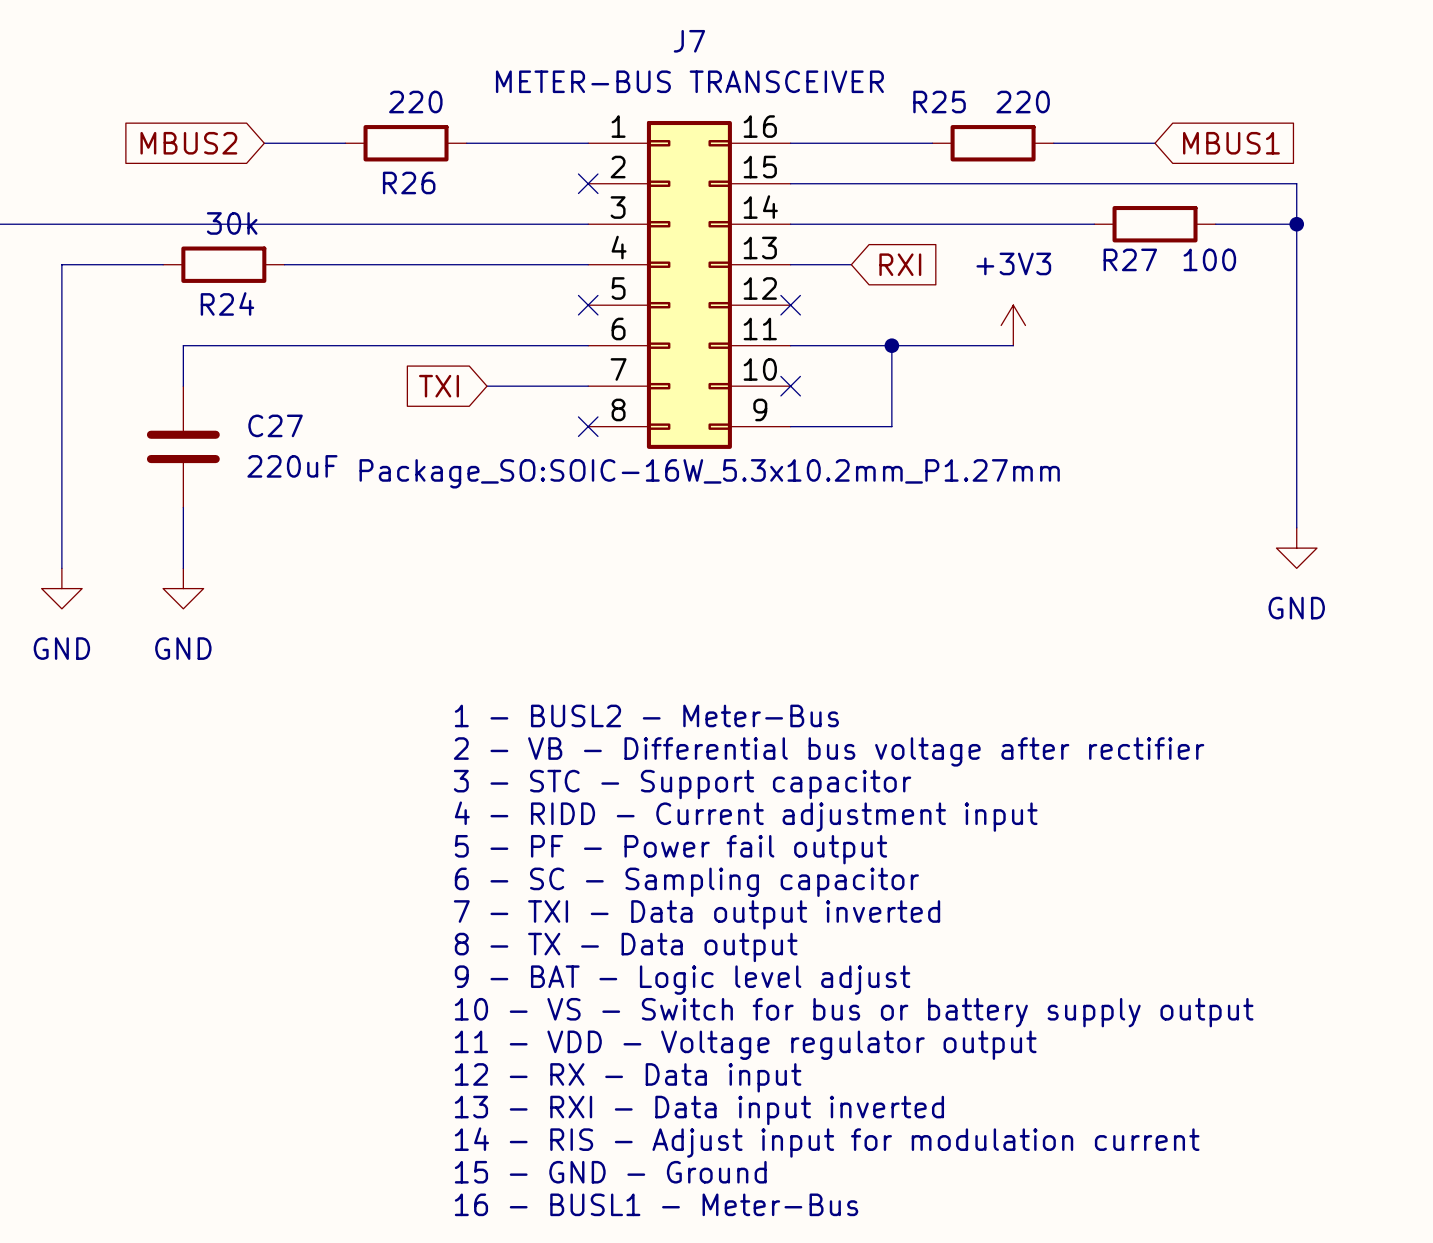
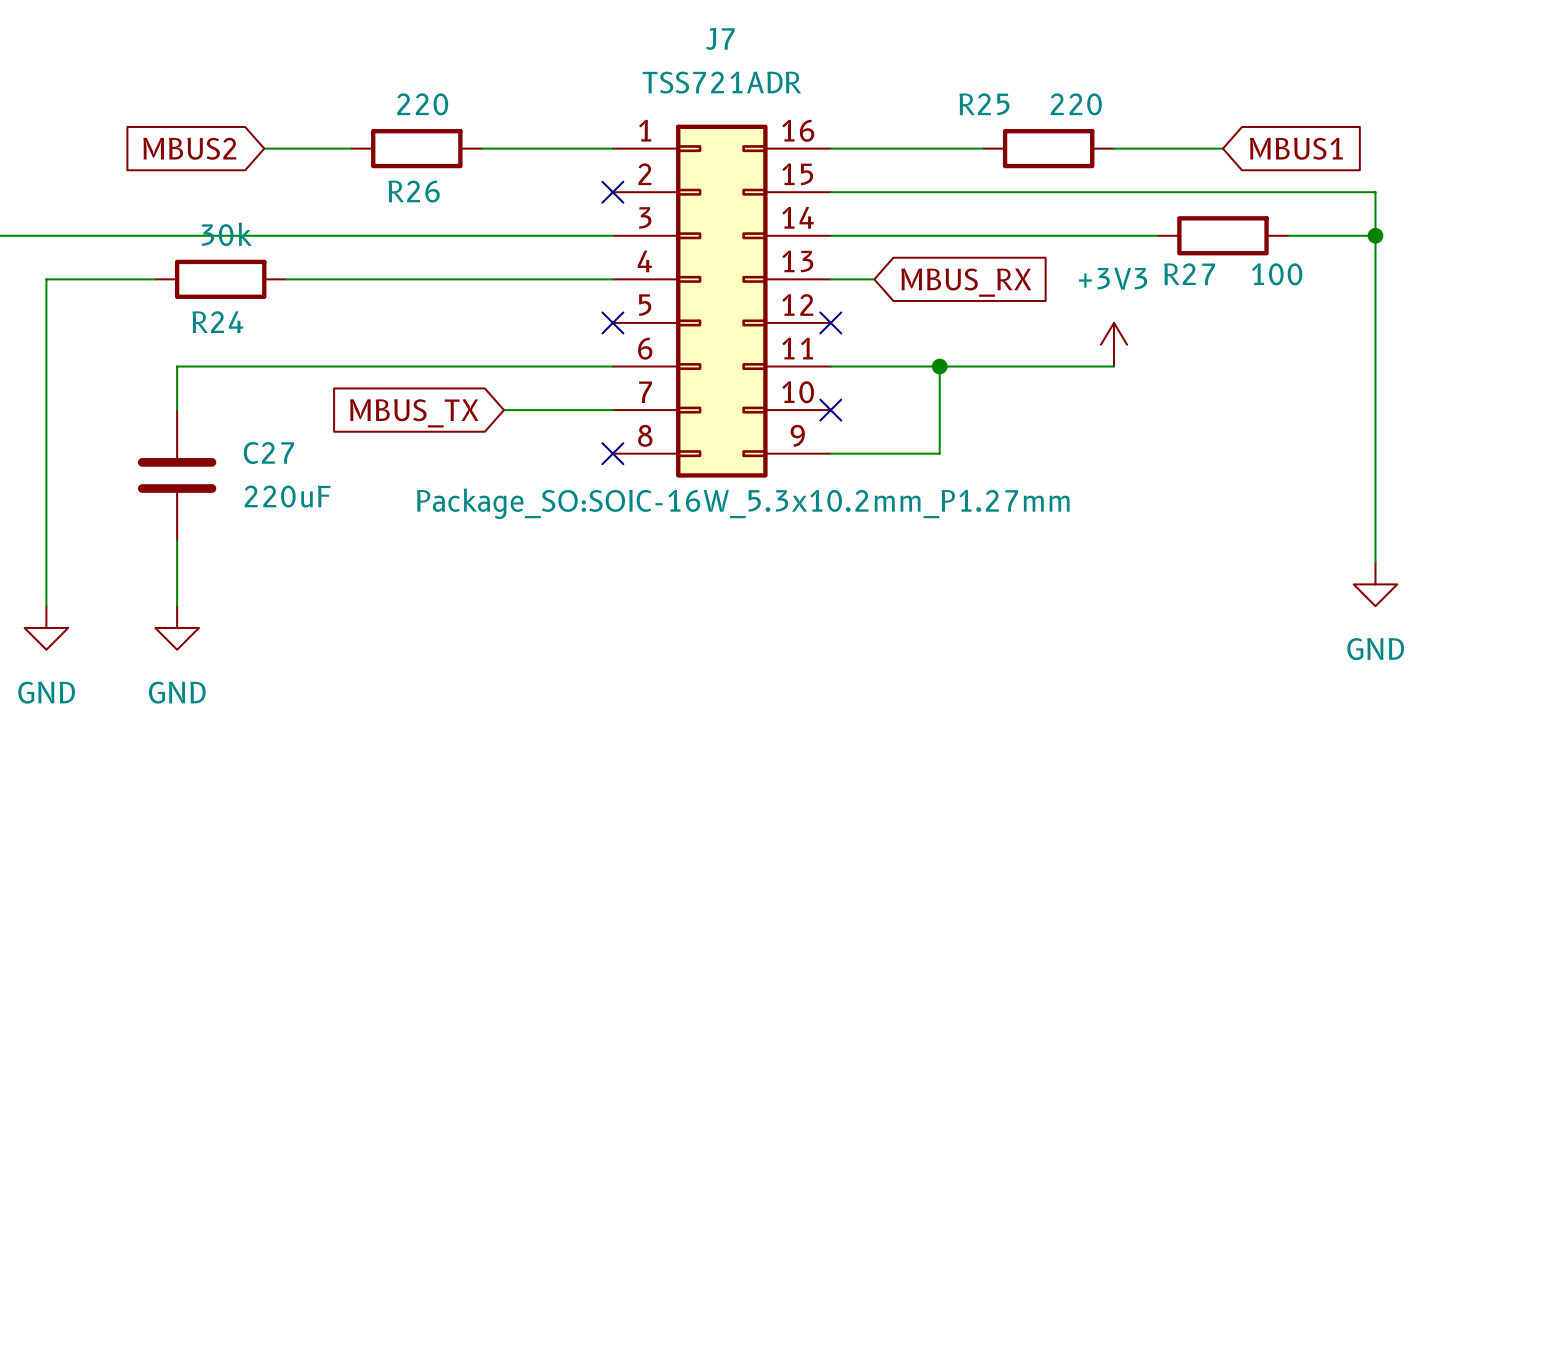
J7 value: METER-BUS TRANSCEIVER (689, 81) -> TSS721ADR (721, 82)
wire: (831, 264) (851, 264) -> none
global label: RXI (900, 264) -> none
global label: none -> MBUS_RX (966, 282)
power symbol position: +3V3 (1013, 325) -> +3V3 (1114, 344)
wire: none -> (1070, 366) (1114, 366)
global label: TXI (439, 386) -> MBUS_TX (414, 413)
text: 1 - BUSL2 - Meter-Bus (646, 715) -> none
text: 2 - VB - Differential bus voltage after rectifier (829, 751) -> none
text: 3 - STC - Support capacitor (682, 784) -> none
text: 4 - RIDD - Current adjustment input (746, 816) -> none
text: 5 - PF - Power fail output (670, 849) -> none
text: 6 - SC - Sampling capacitor (686, 882) -> none
text: 7 - TXI - Data output inverted (697, 914) -> none
text: 8 - TX - Data output (626, 947) -> none
text: 9 - BAT - Logic level adjust (682, 980) -> none
text: 10 - VS - Switch for bus or battery supply output (854, 1012) -> none
text: 11 - VDD - Voltage regulator output (745, 1045) -> none
text: 12 - RX - Data input (628, 1077) -> none
text: 13 - RXI - Data input inverted (699, 1110) -> none
text: 14 - RIS - Adjust input for modulation current (827, 1142) -> none
text: 15 - GND - Ground (610, 1172) -> none
text: 16 - BUSL1 - Meter-Bus (656, 1204) -> none

